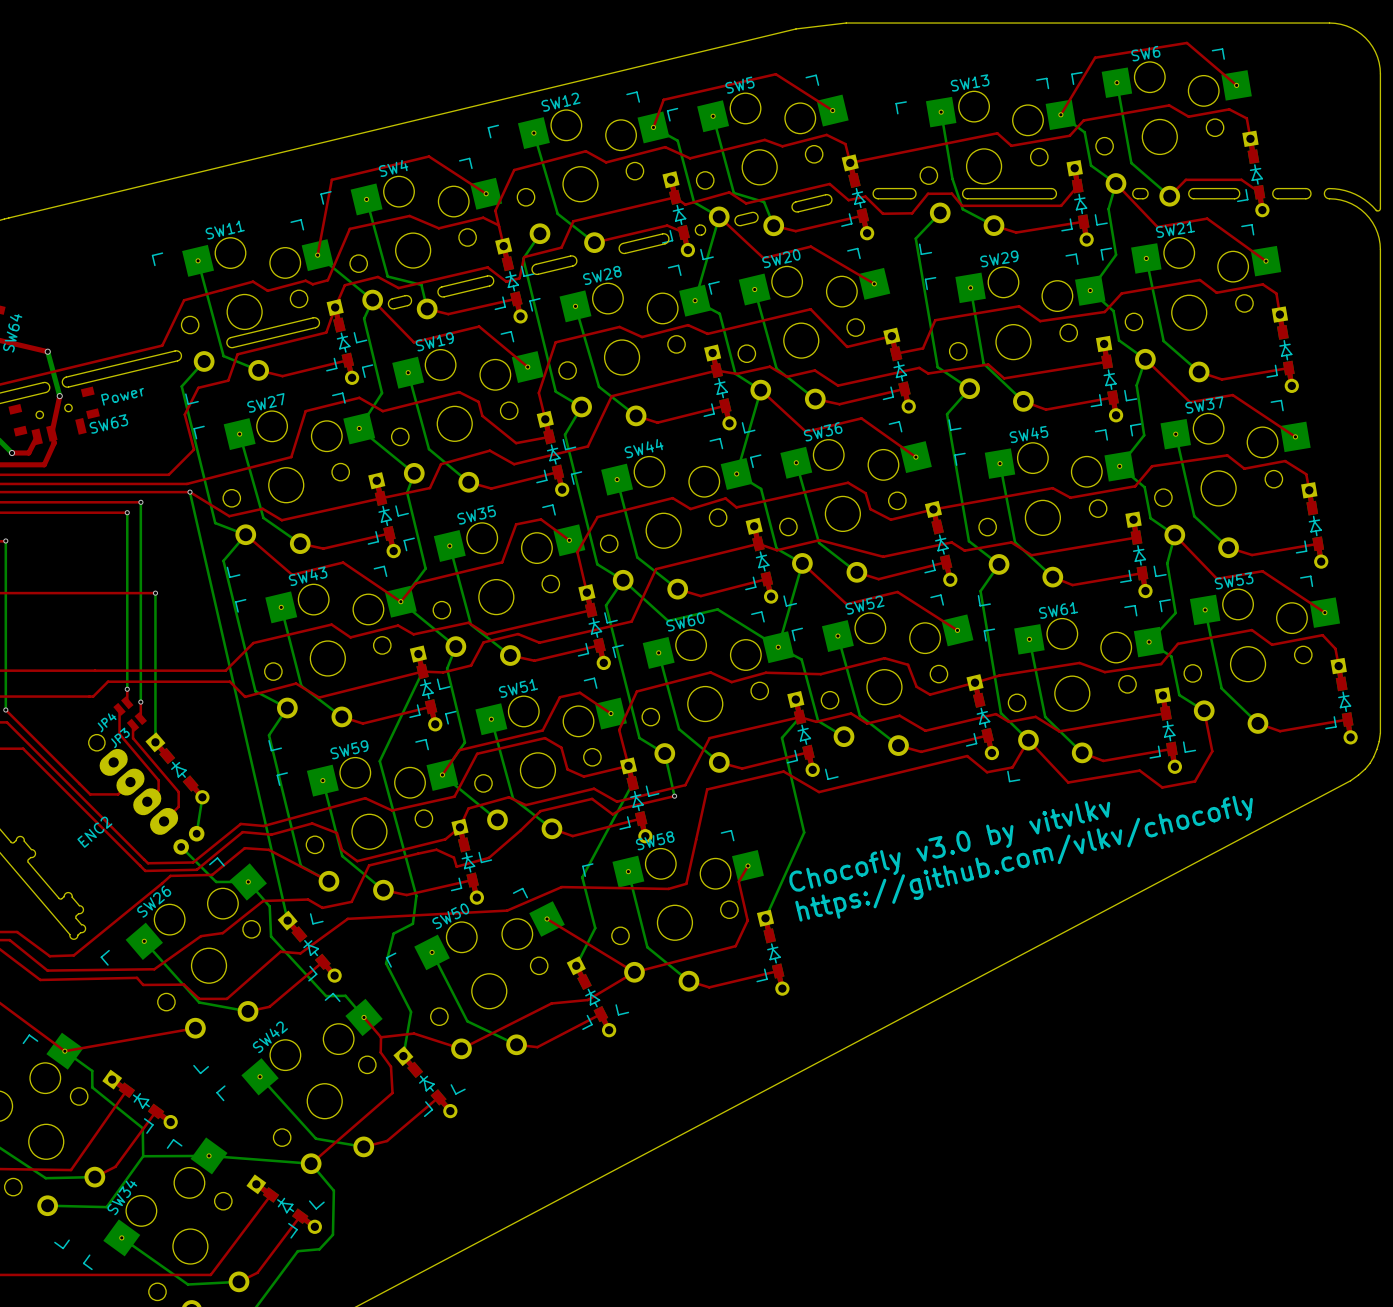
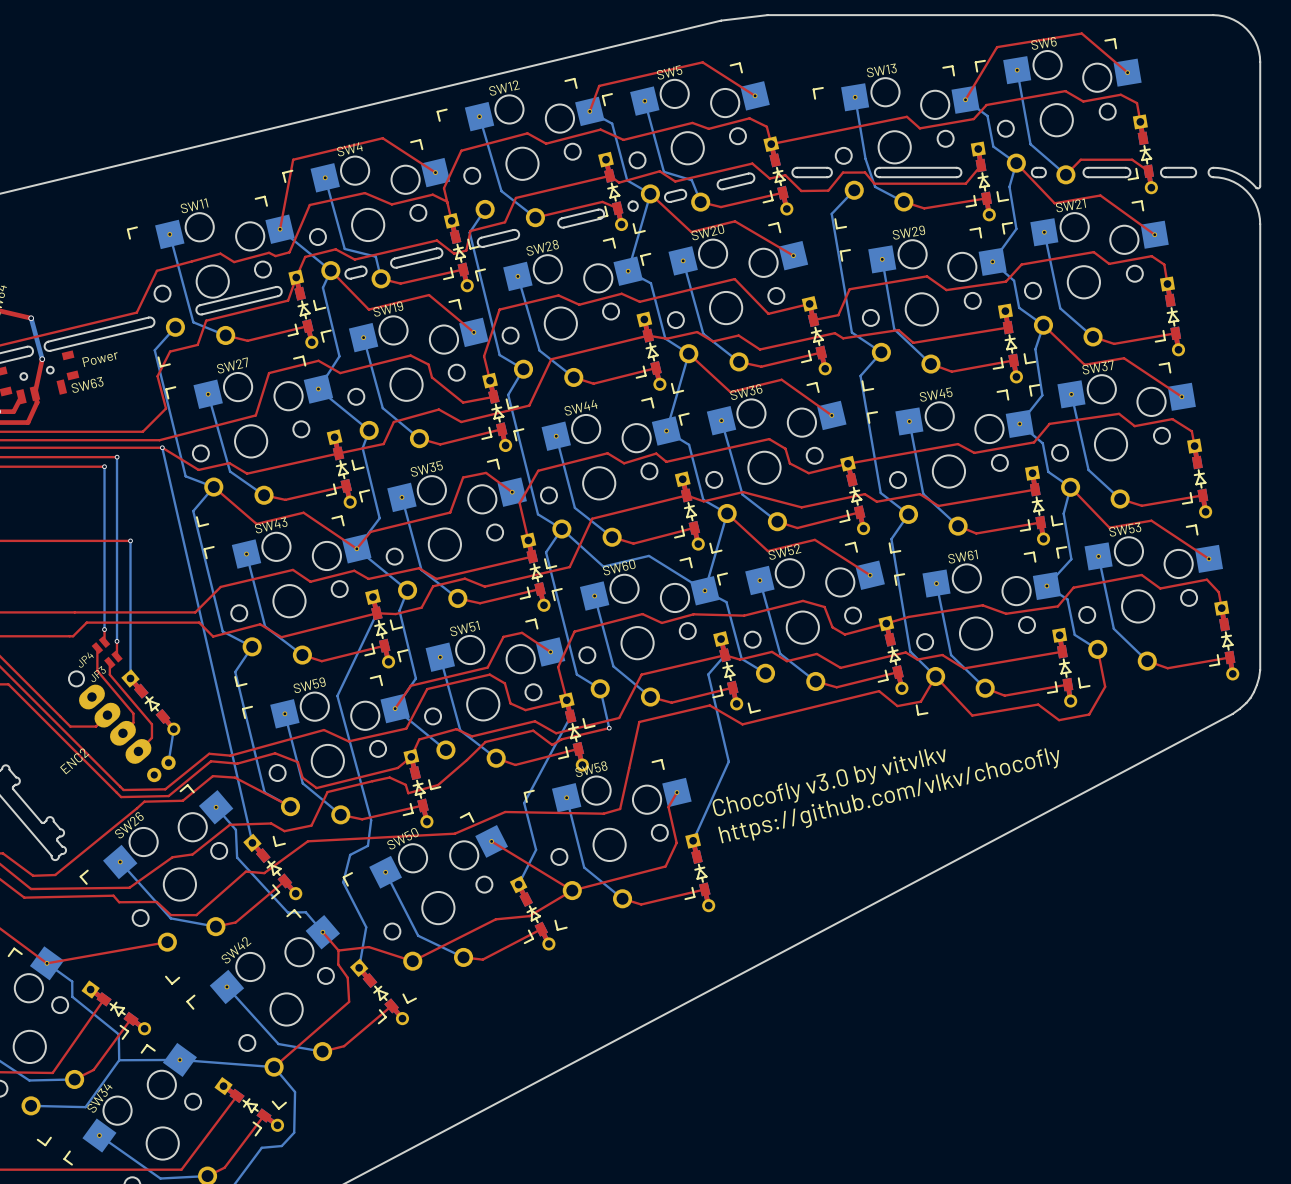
bottom track: (181, 846) (216, 881) (248, 881) -> none

